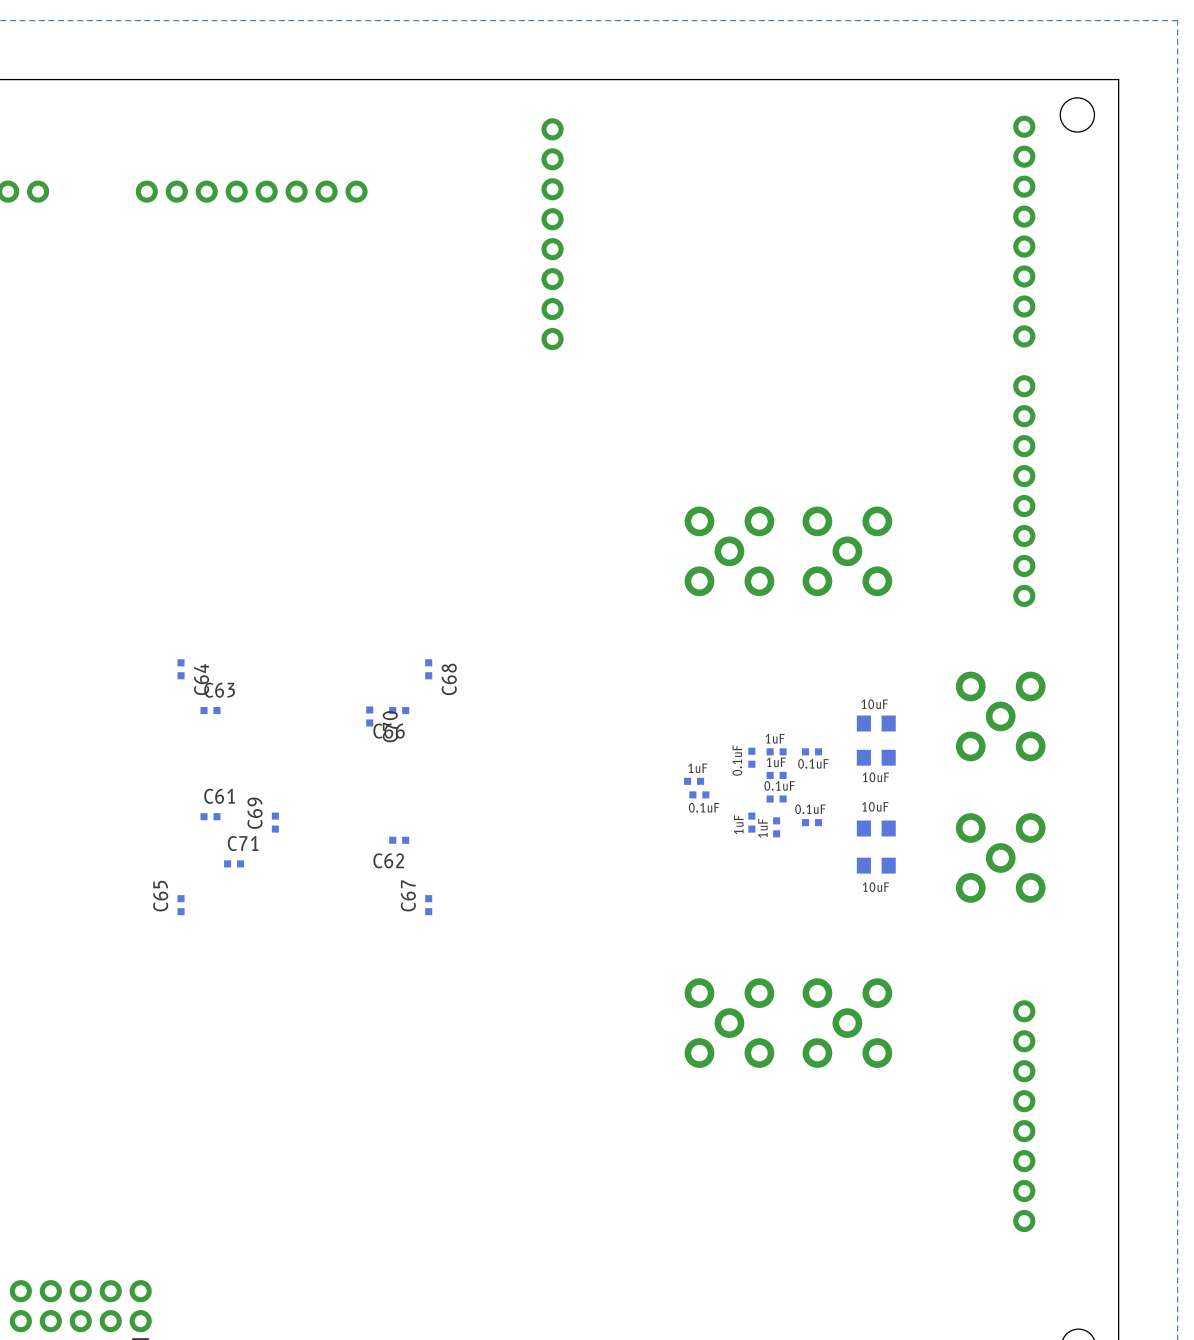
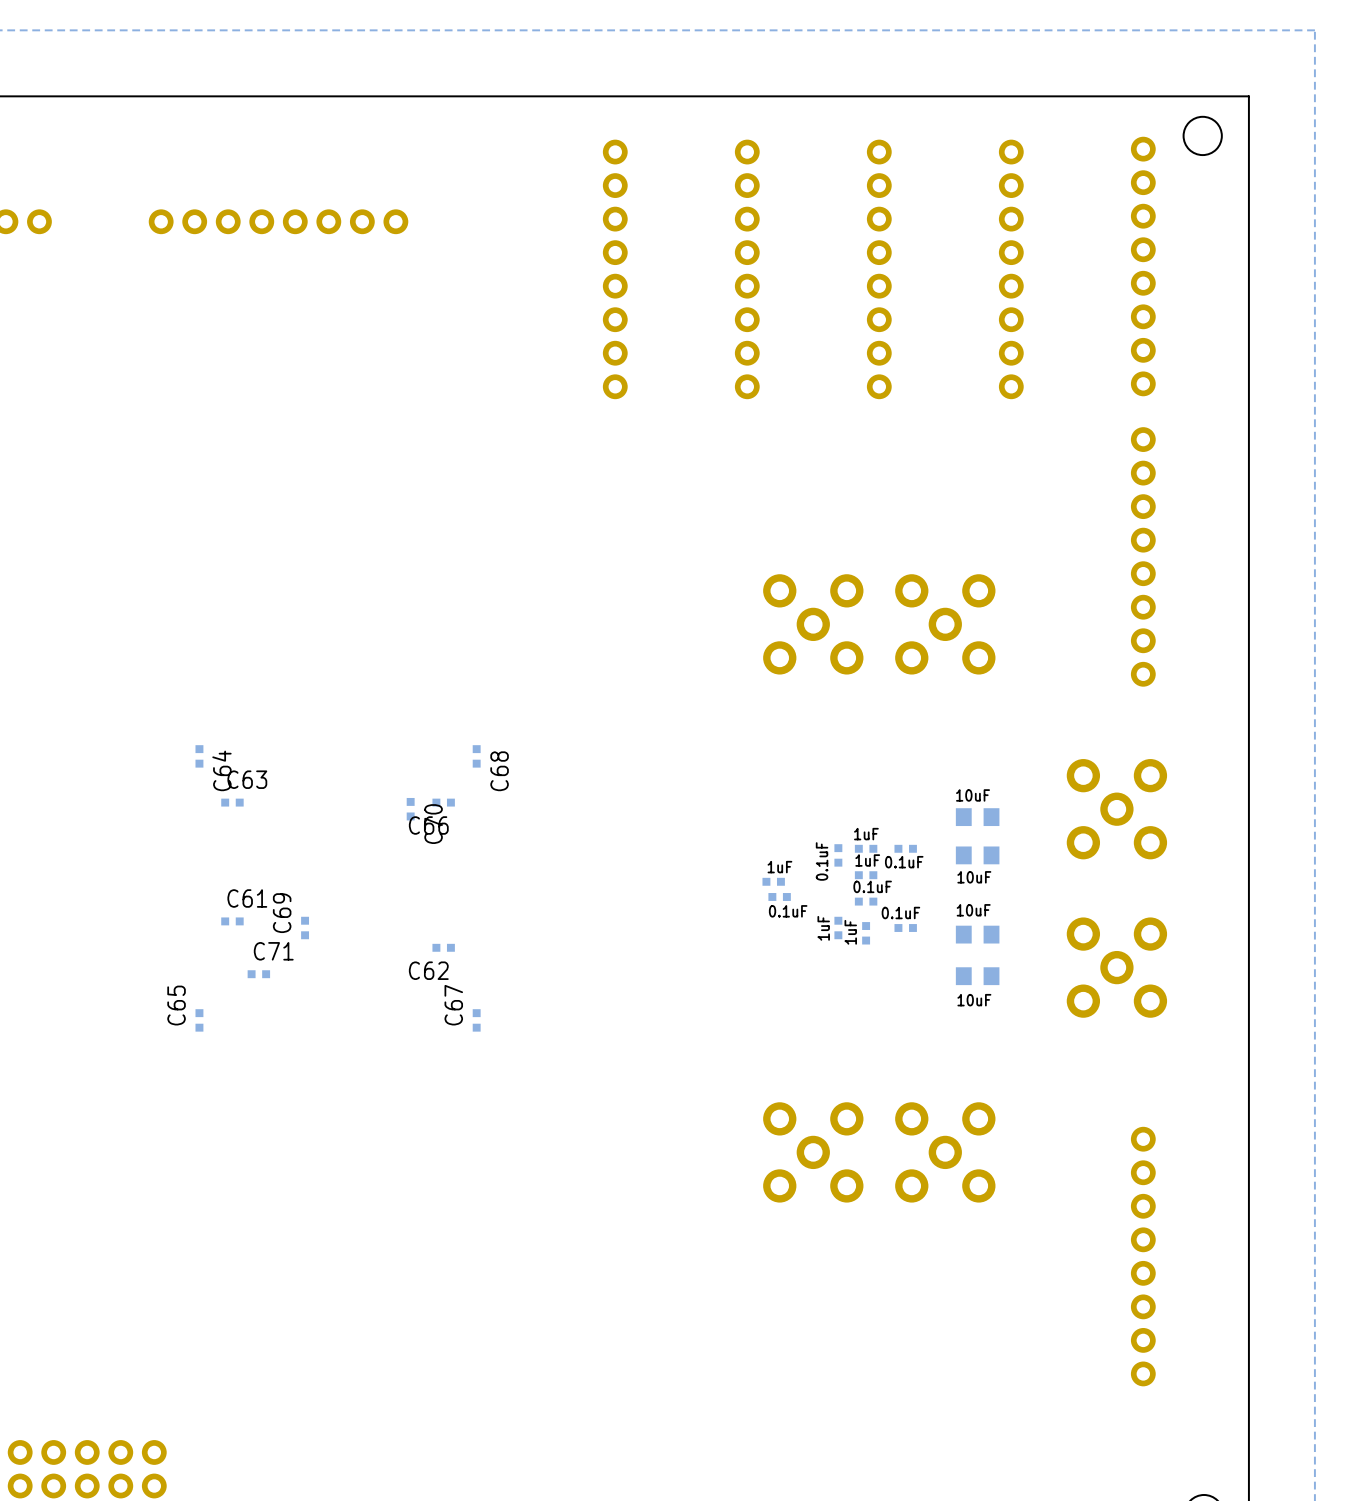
part: none -> (747, 269)
part: none -> (879, 269)
part: none -> (1011, 269)

